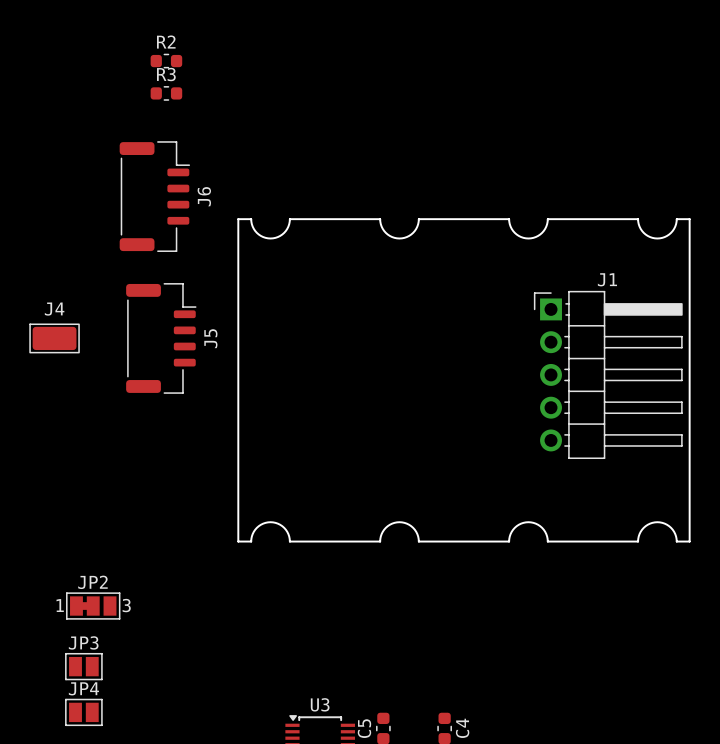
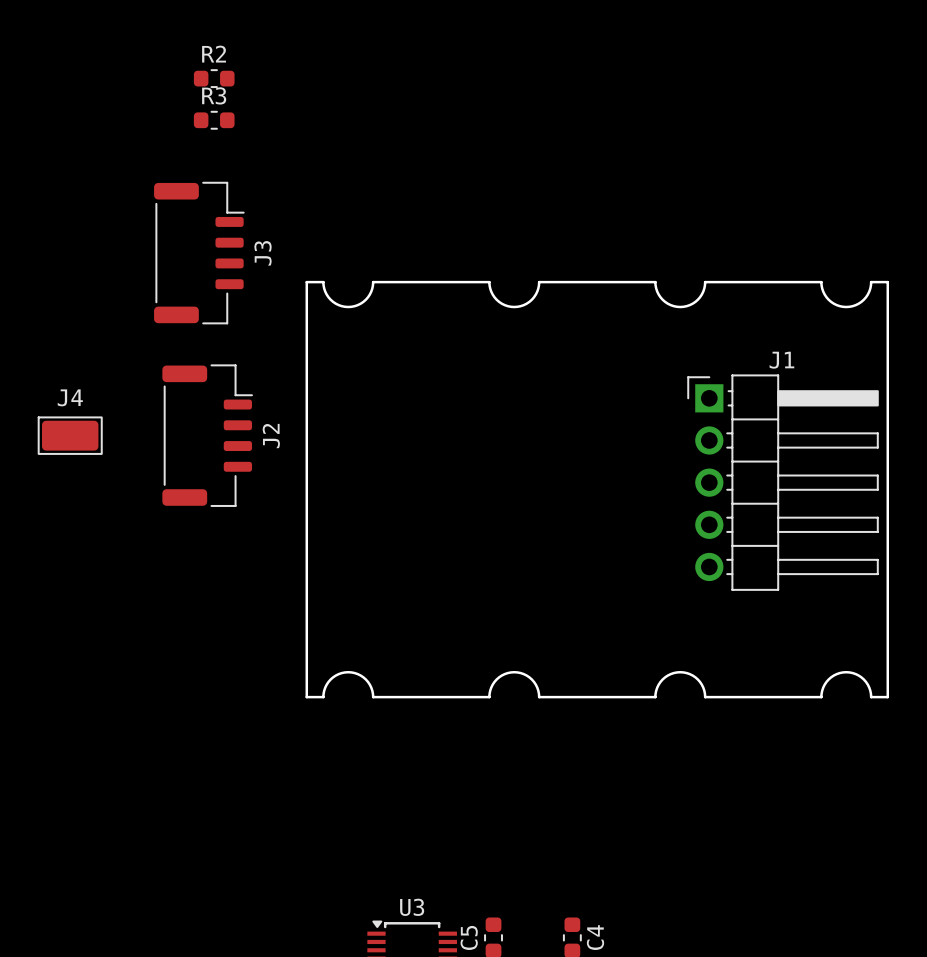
J6 name: J6 (204, 196) -> J3 (263, 253)
J5 name: J5 (210, 338) -> J2 (271, 436)
JP2: (93, 606) -> none
JP3: (83, 666) -> none
JP4: (83, 712) -> none

